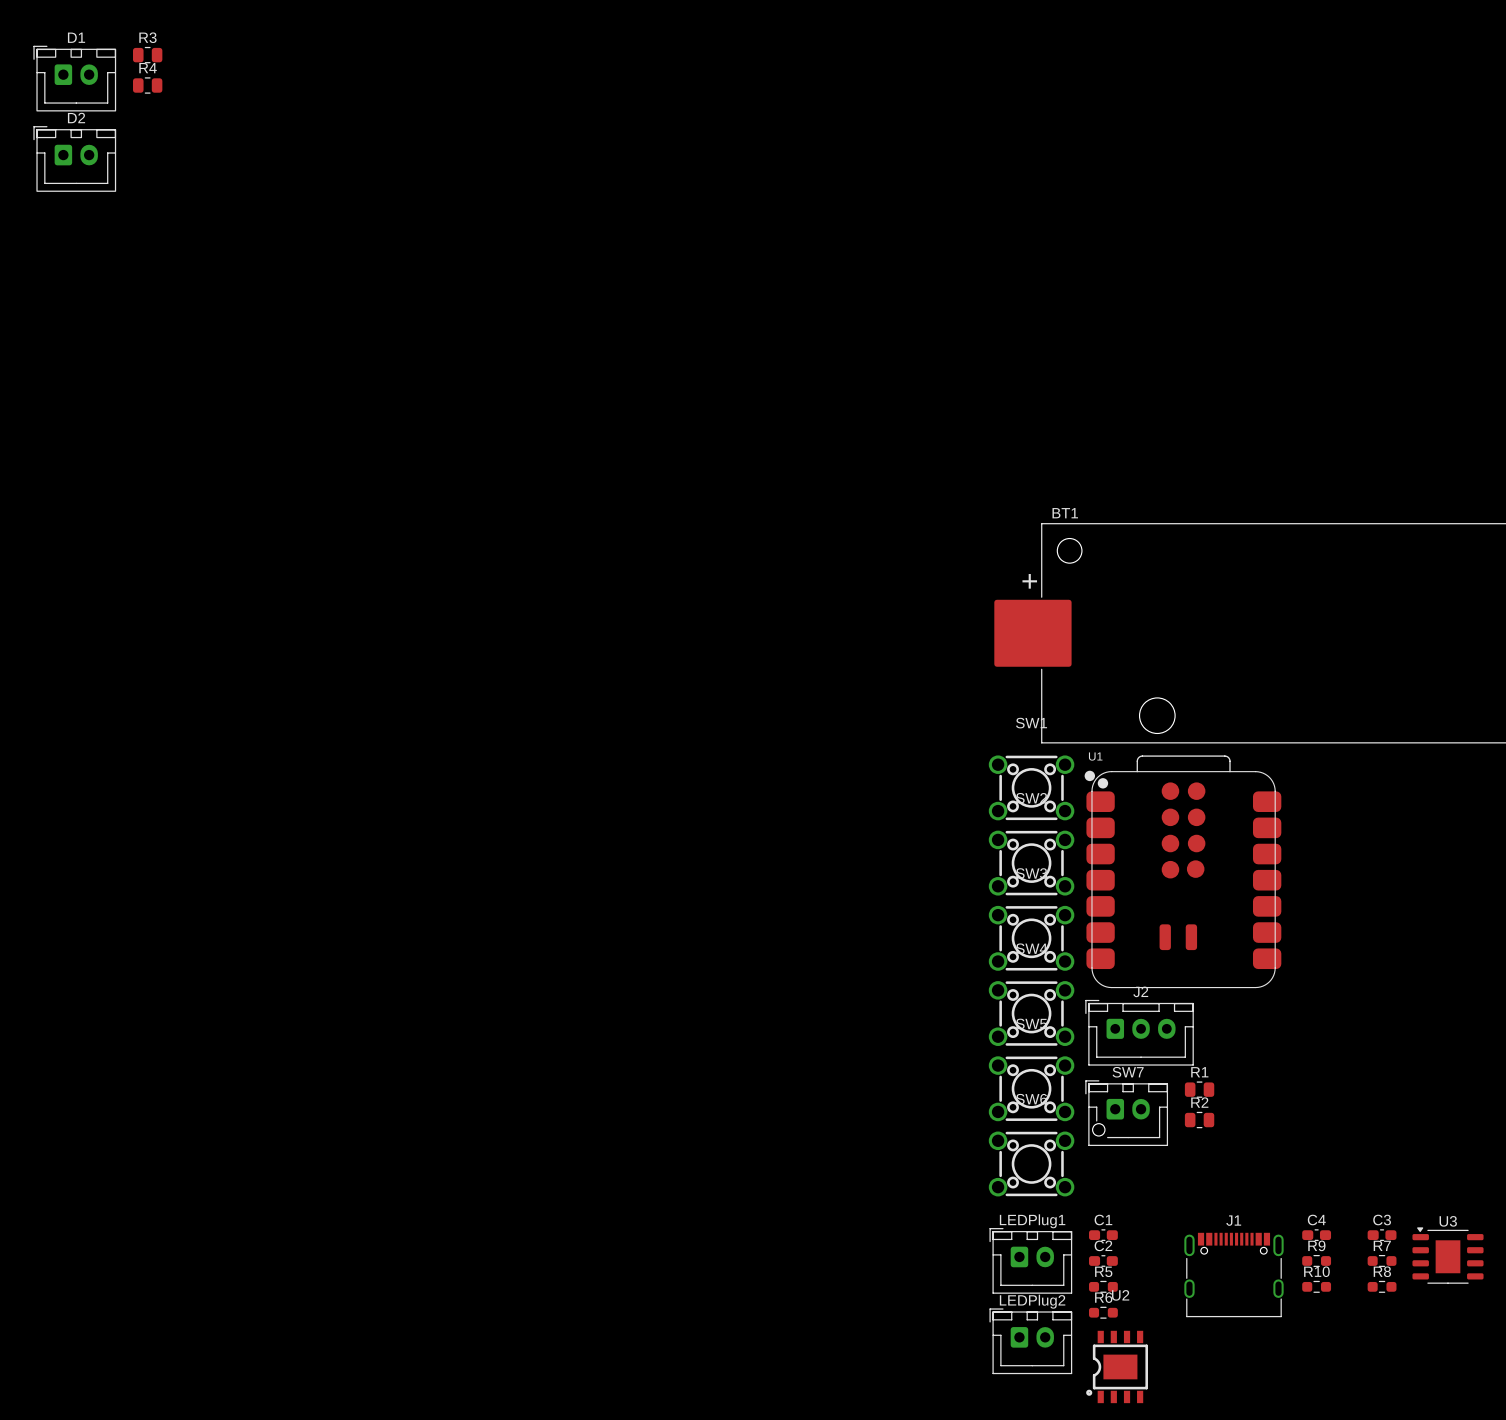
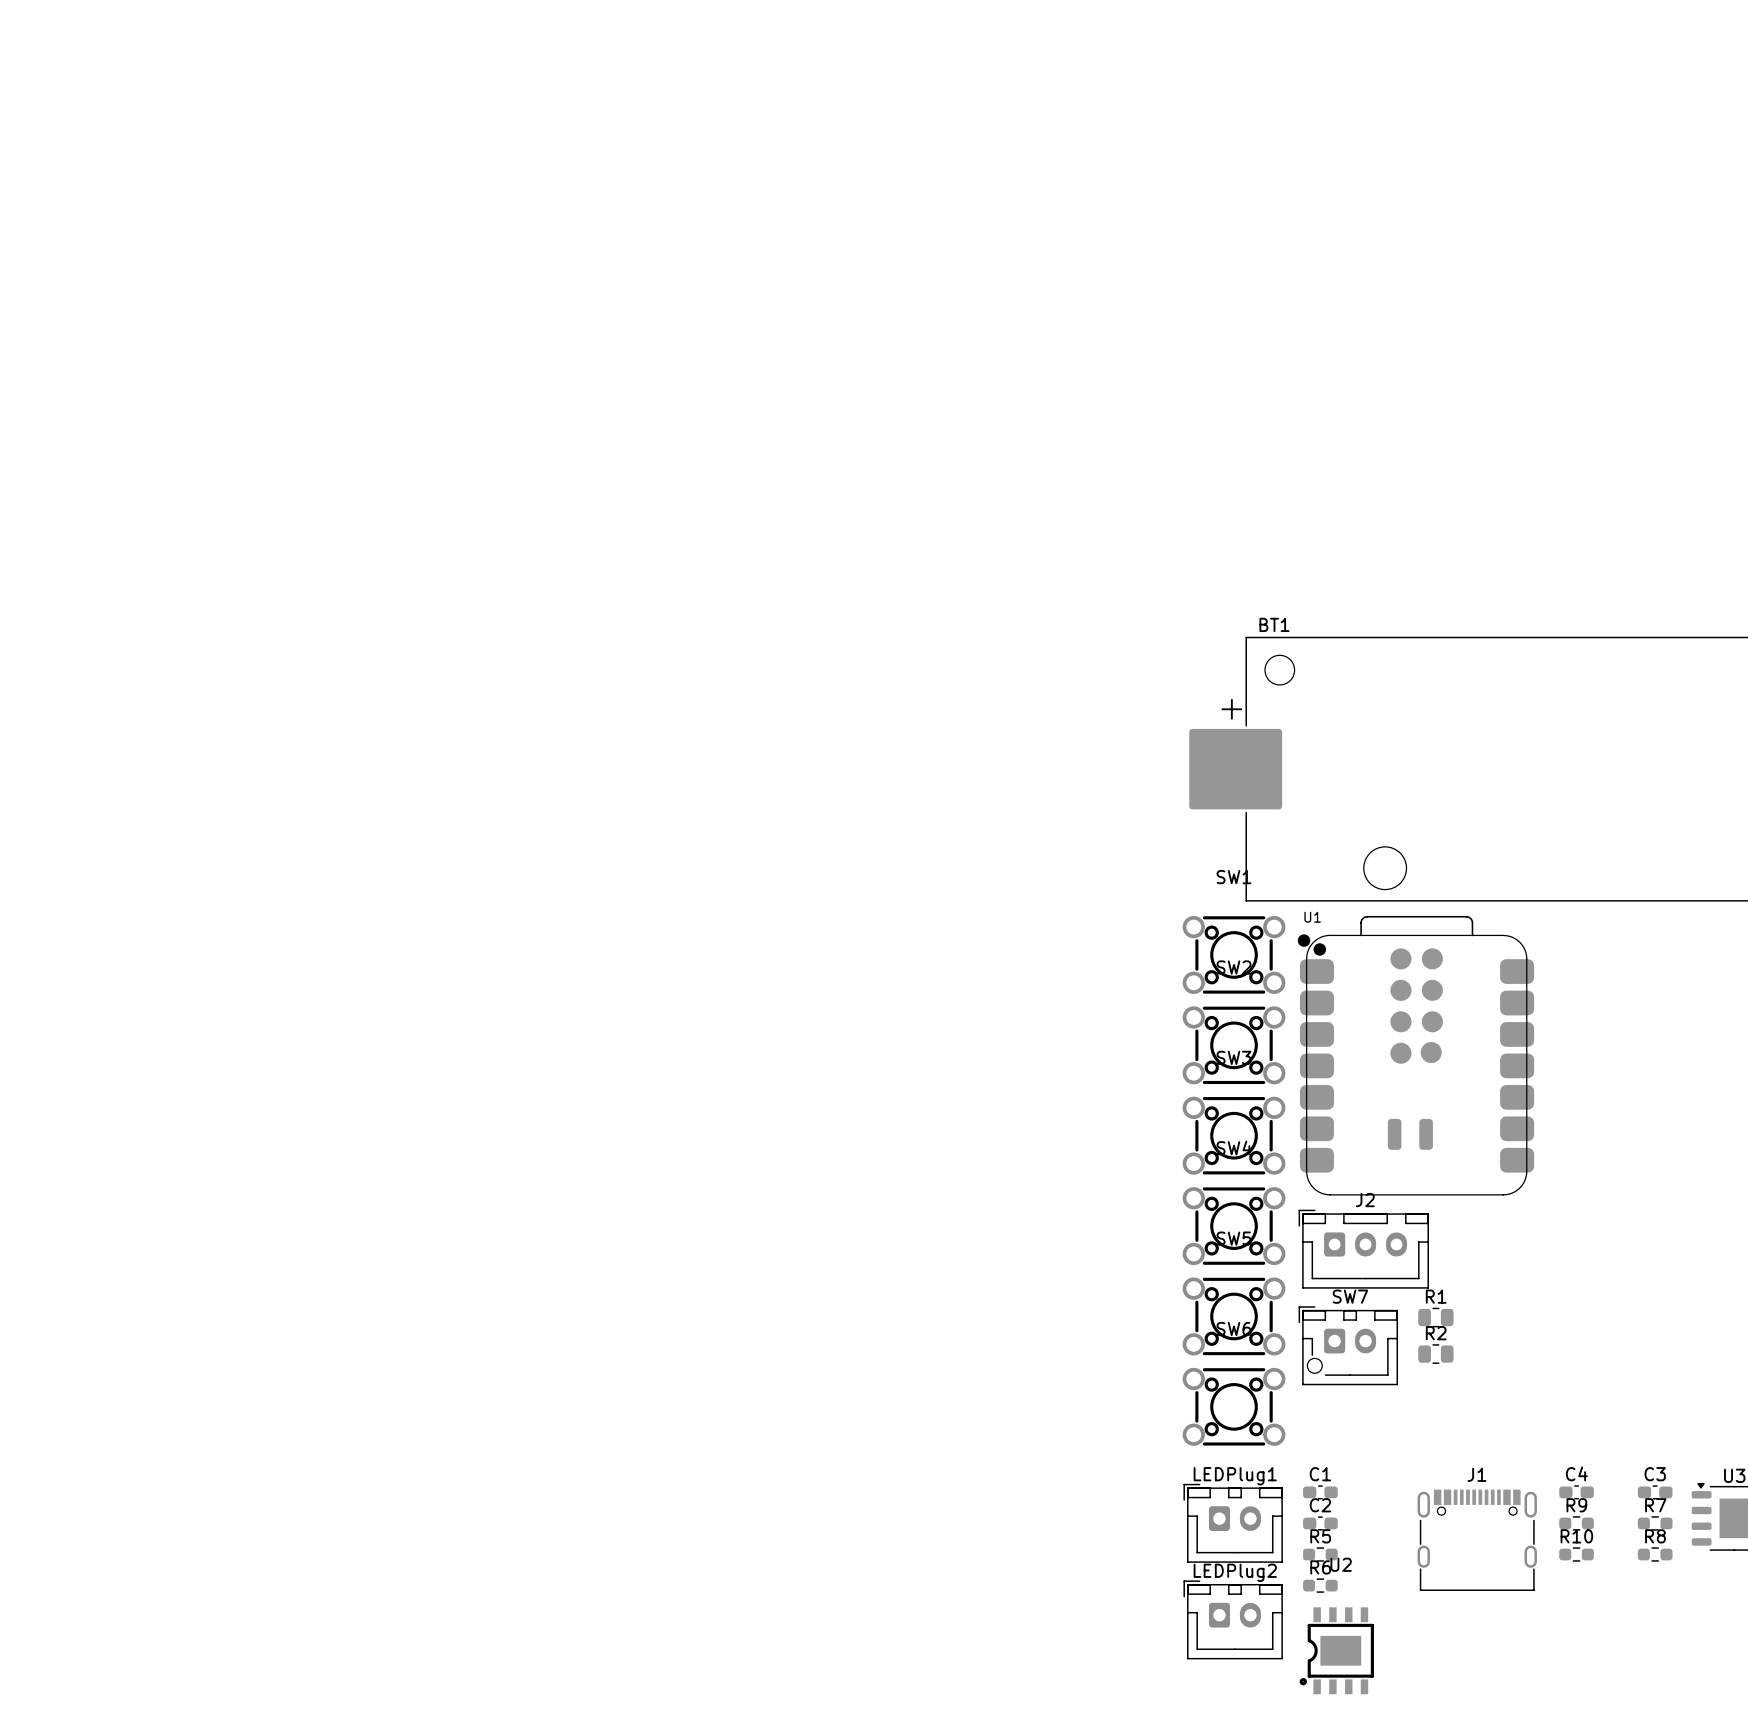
R3: (147, 55) -> none
D1: (74, 78) -> none
R4: (147, 85) -> none
D2: (74, 158) -> none

